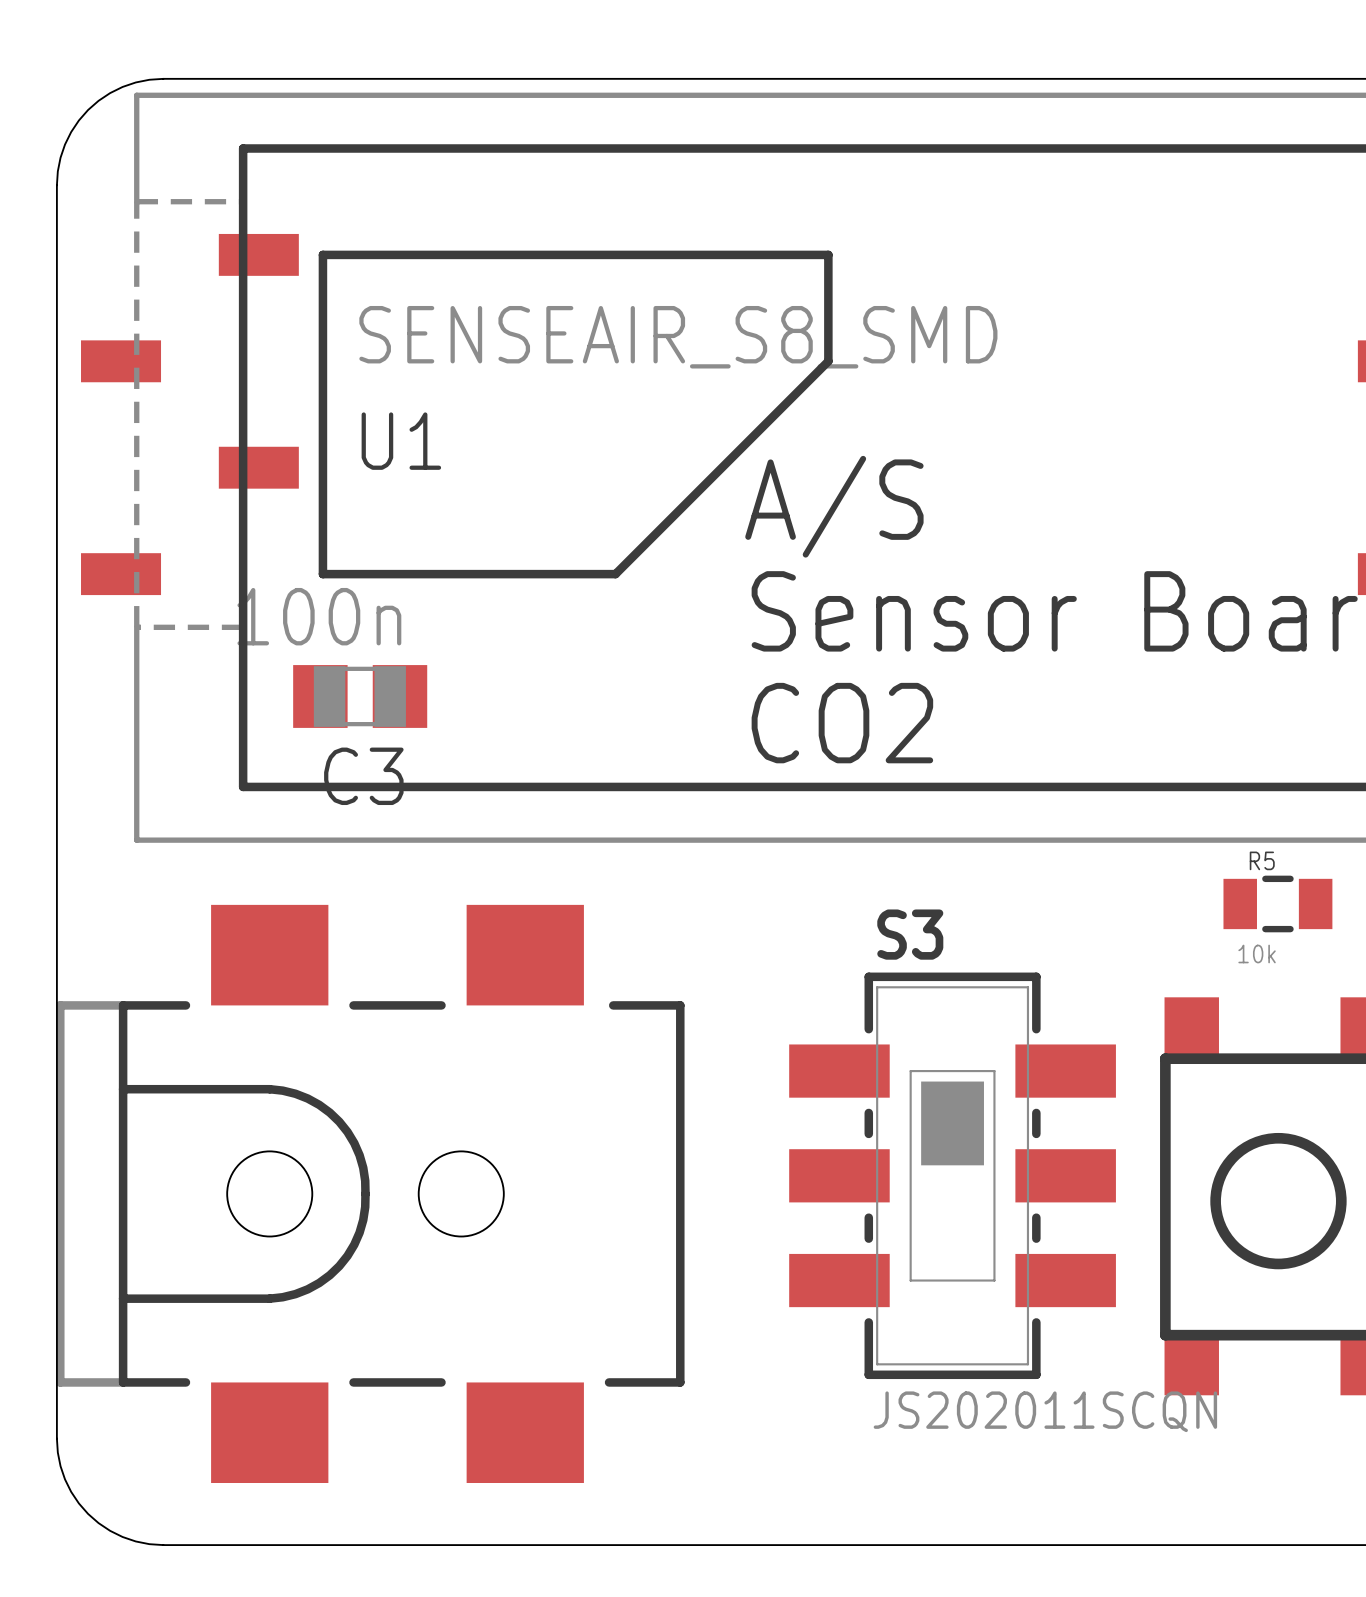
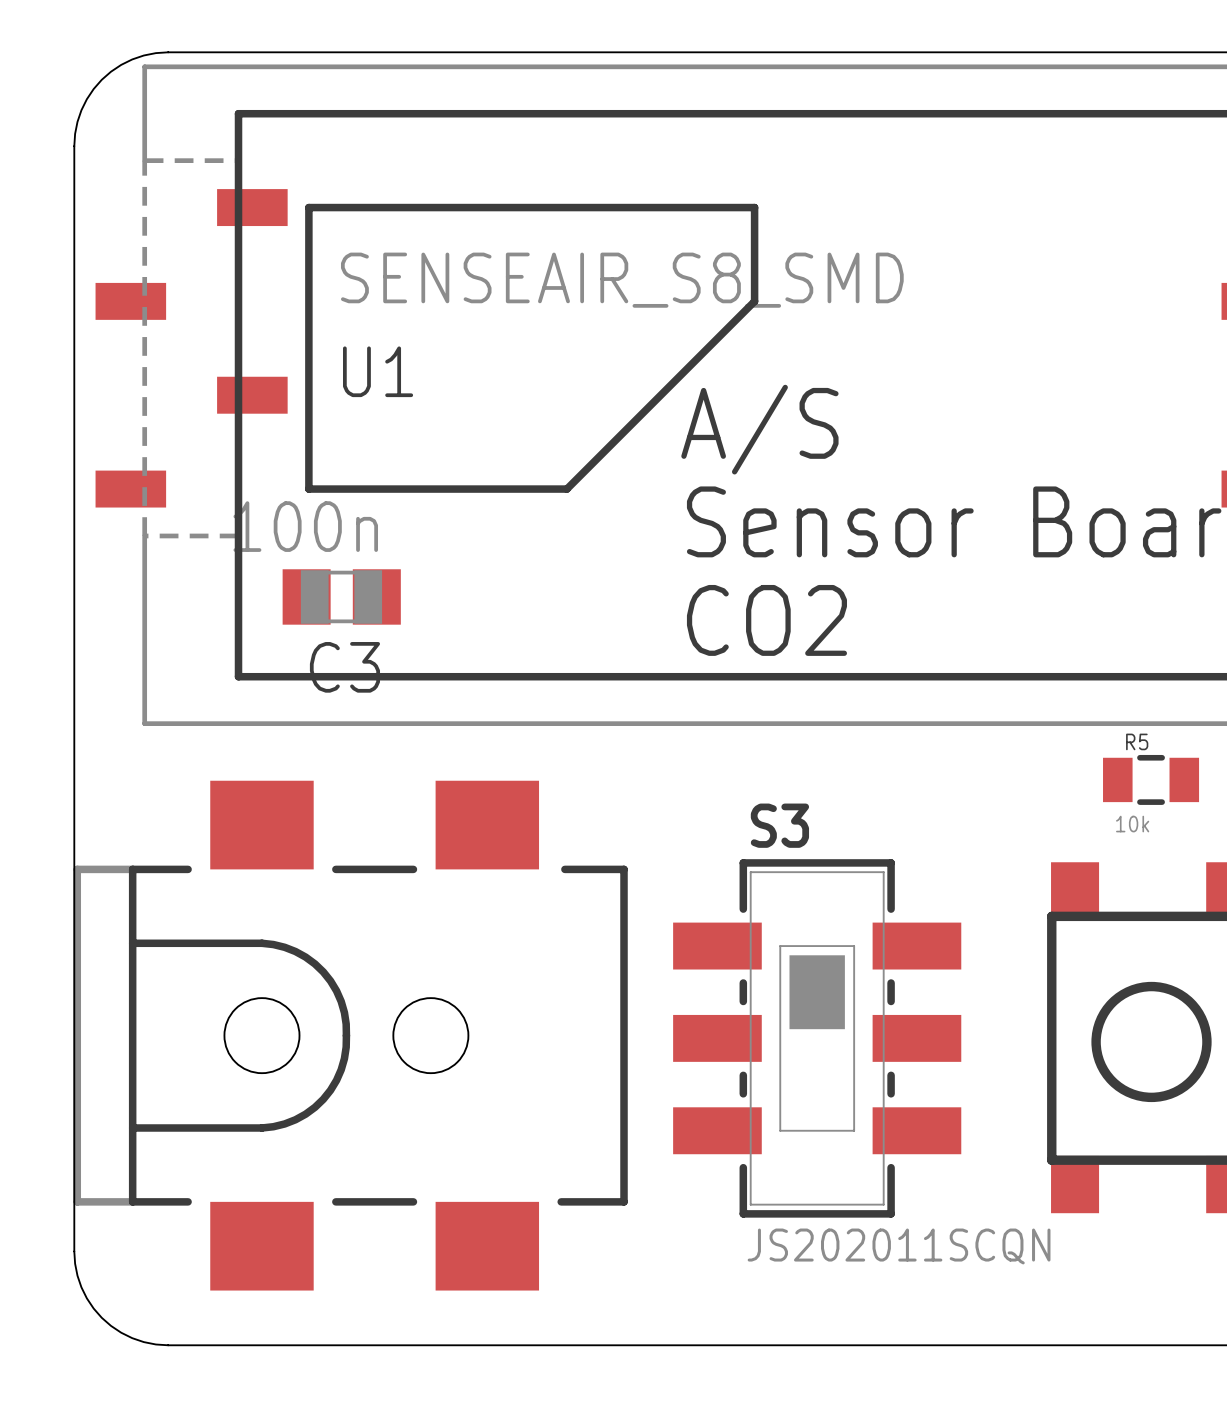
S3 position: (952, 1175) -> (817, 1038)

